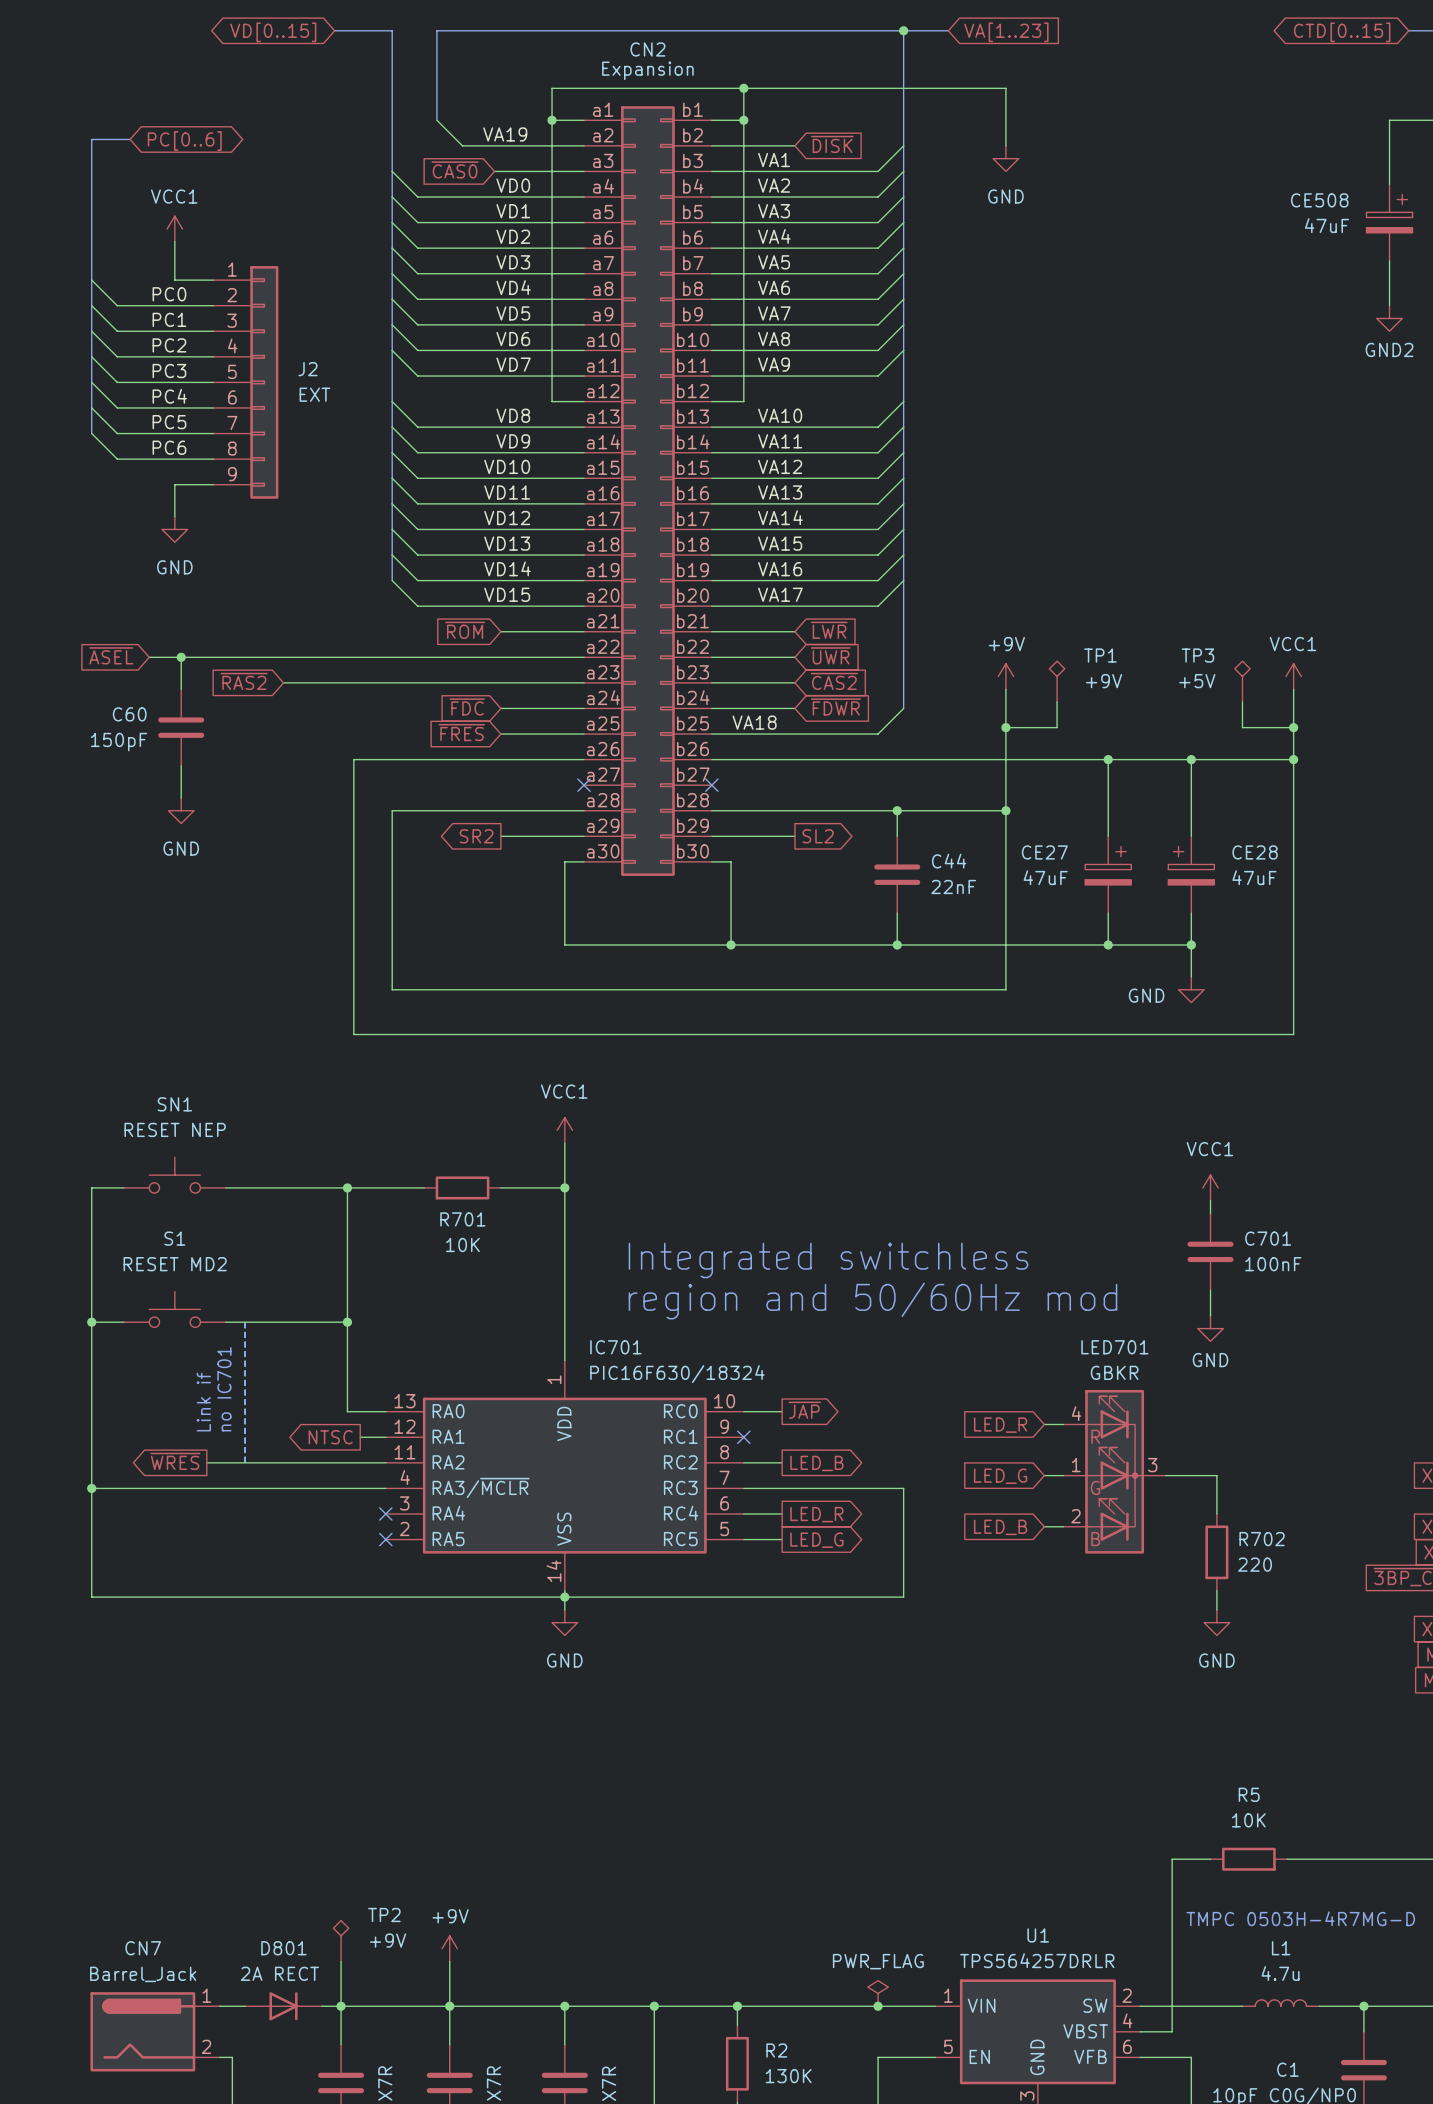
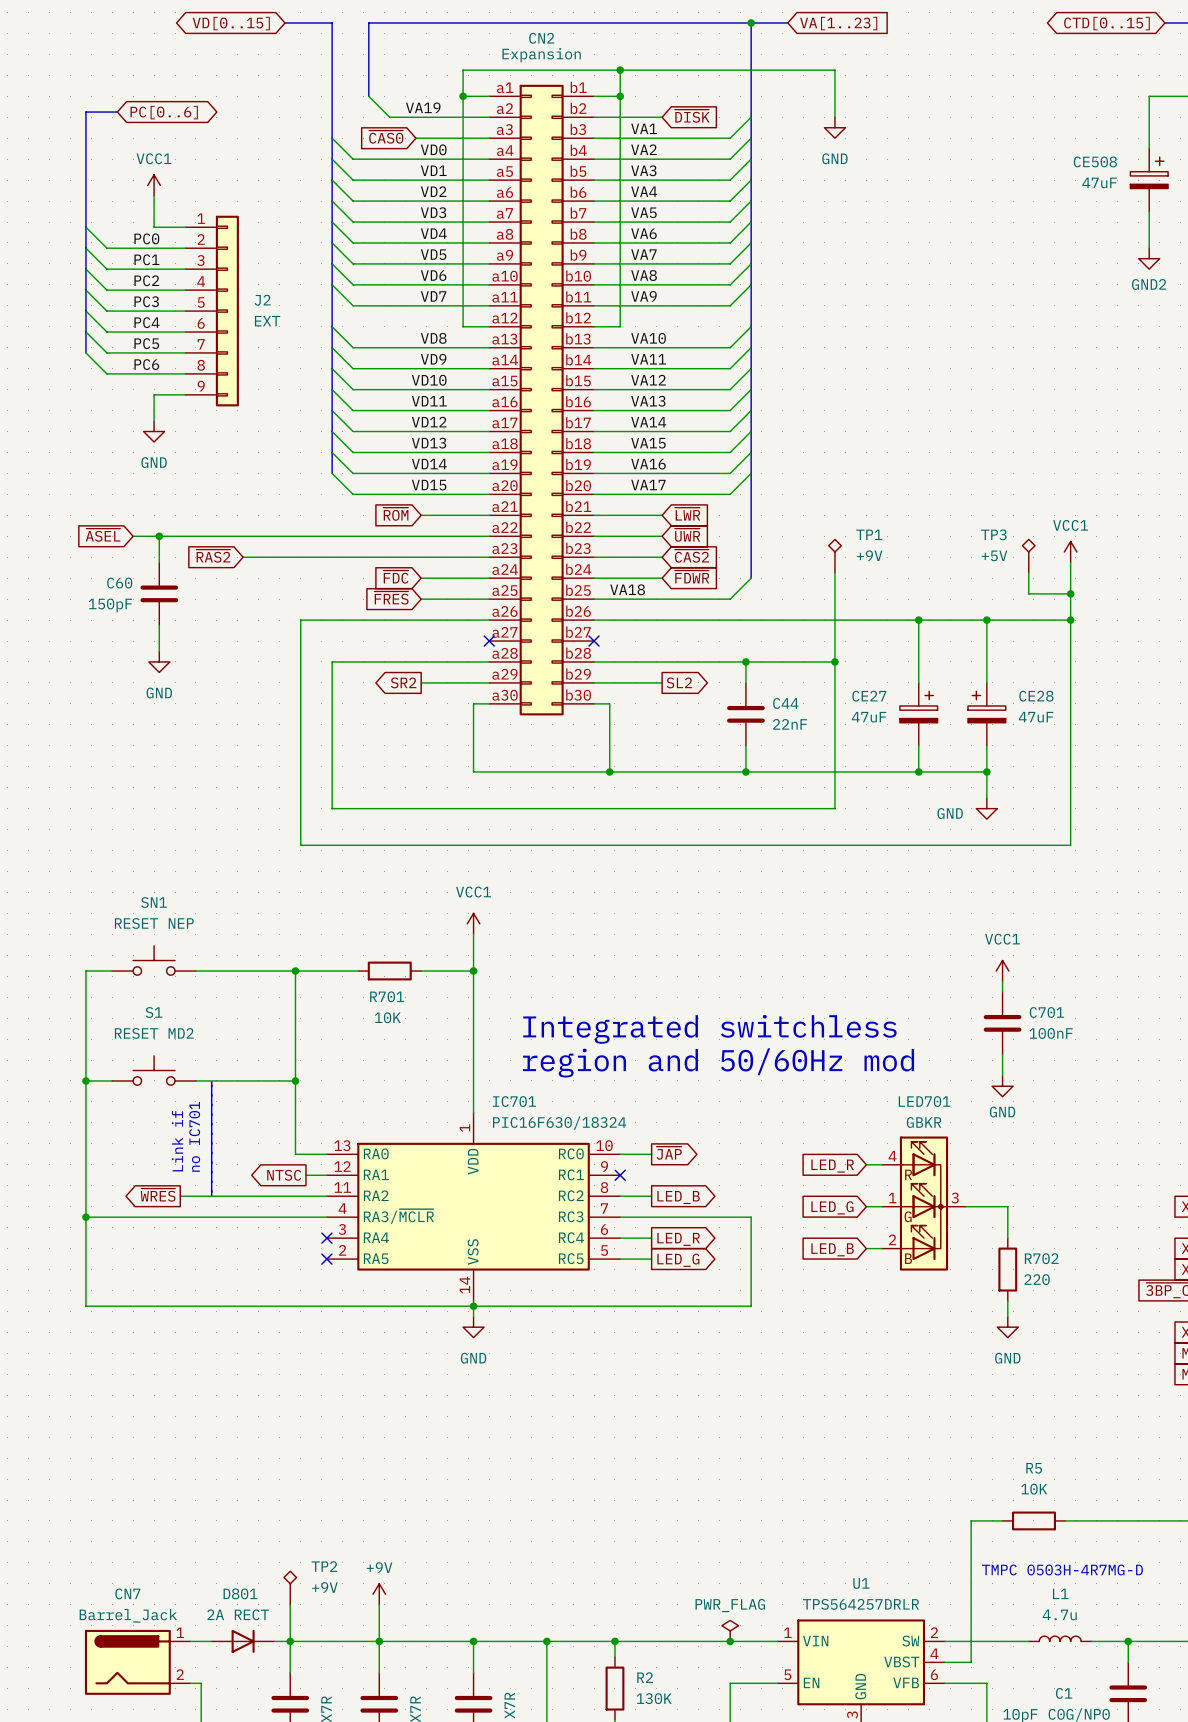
power symbol: +9V (1005, 676) -> none
TP1 position: (1057, 681) -> (834, 556)
wire: (1057, 702) (1057, 727) (1005, 727) -> none
junction: (1005, 727) -> none

